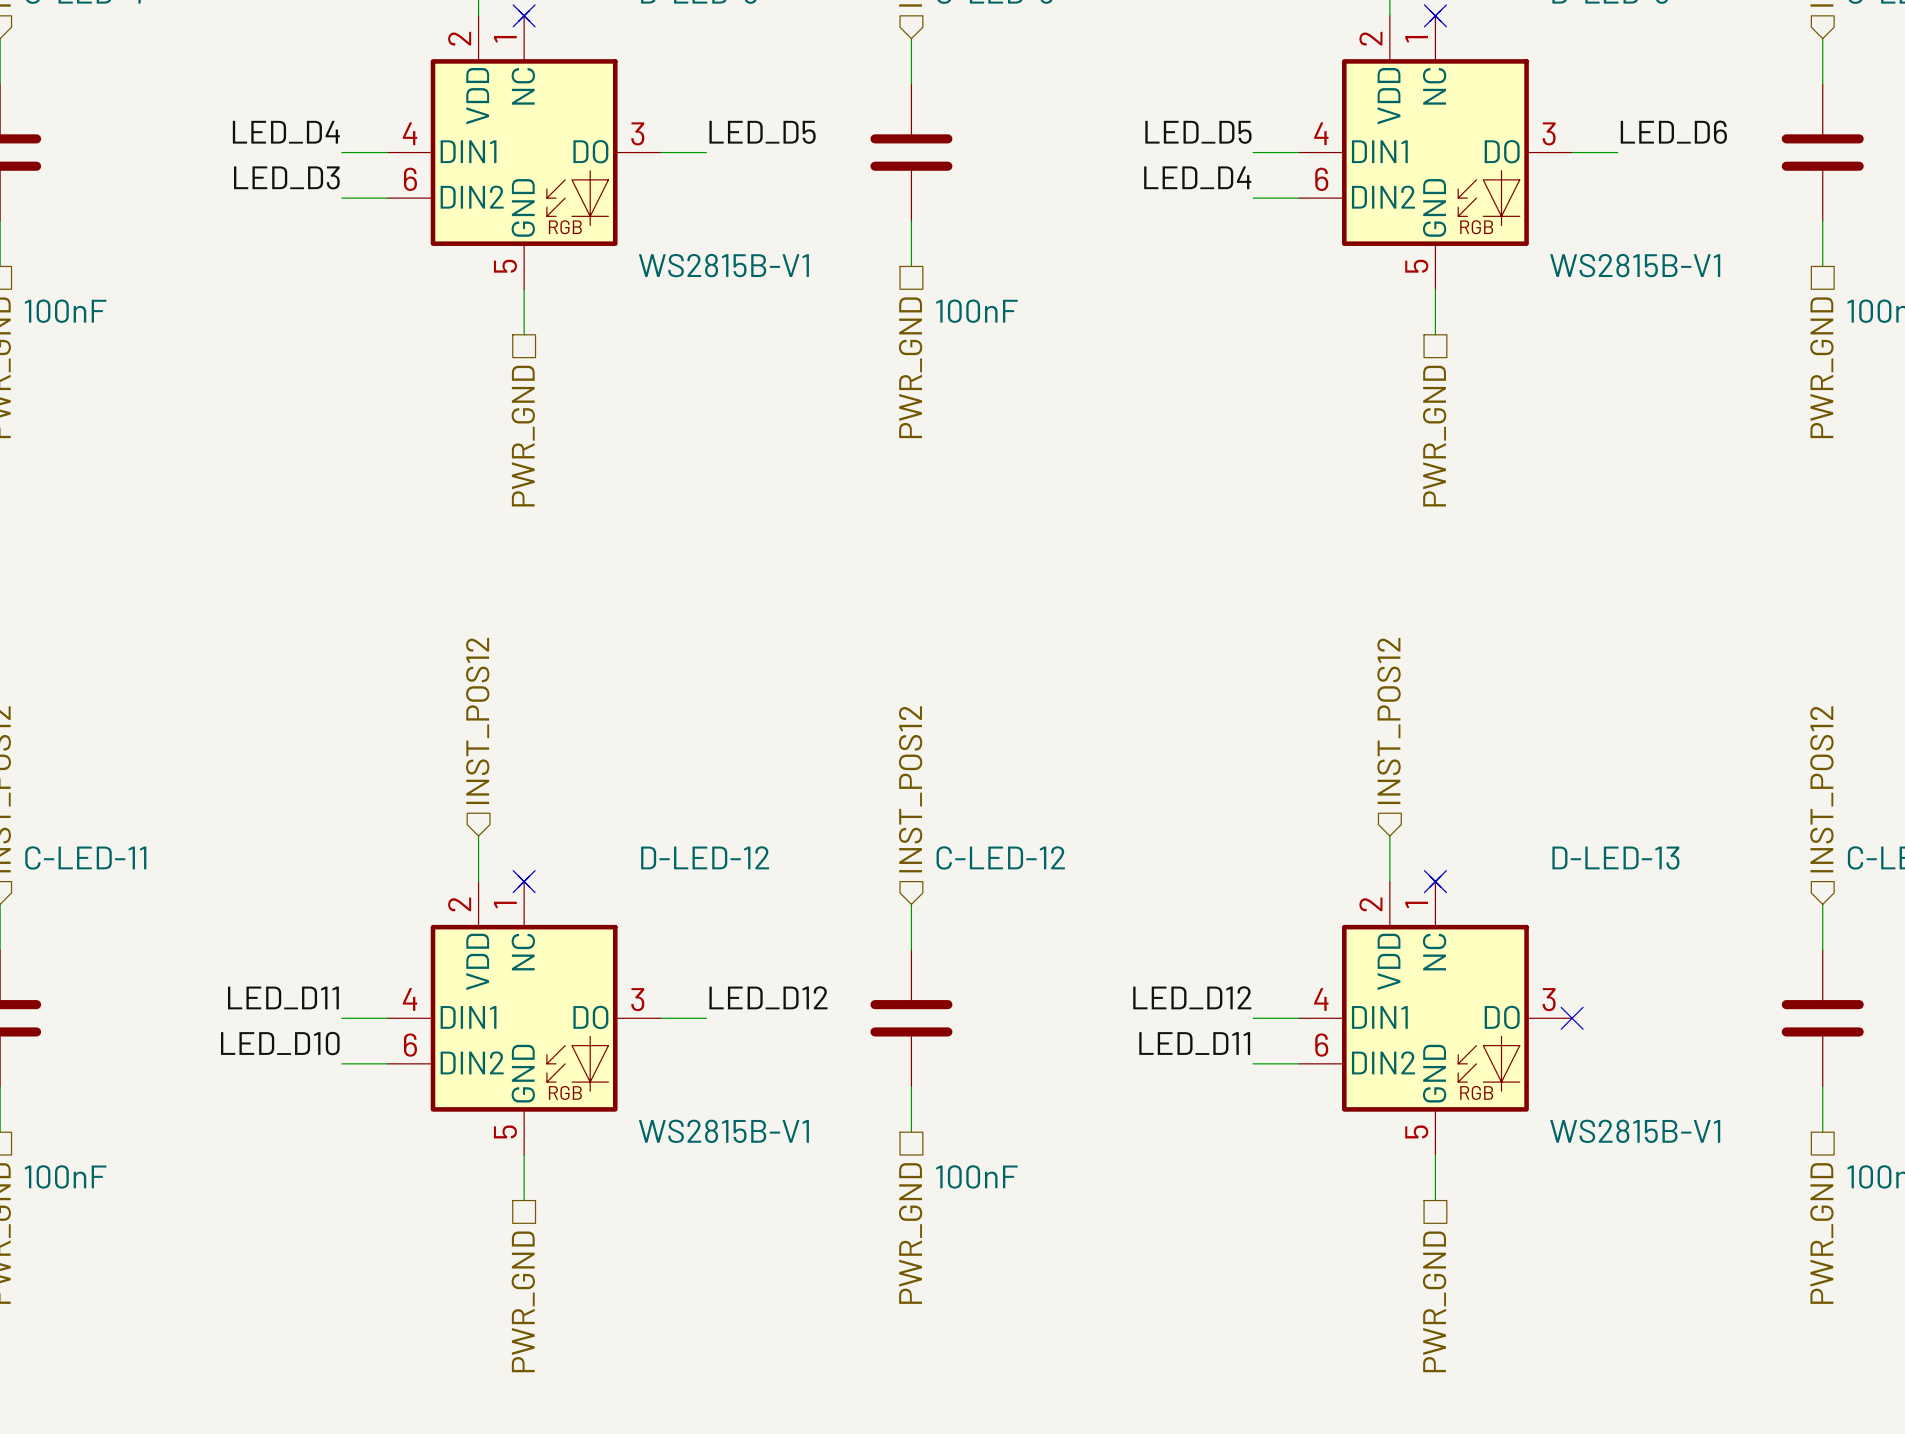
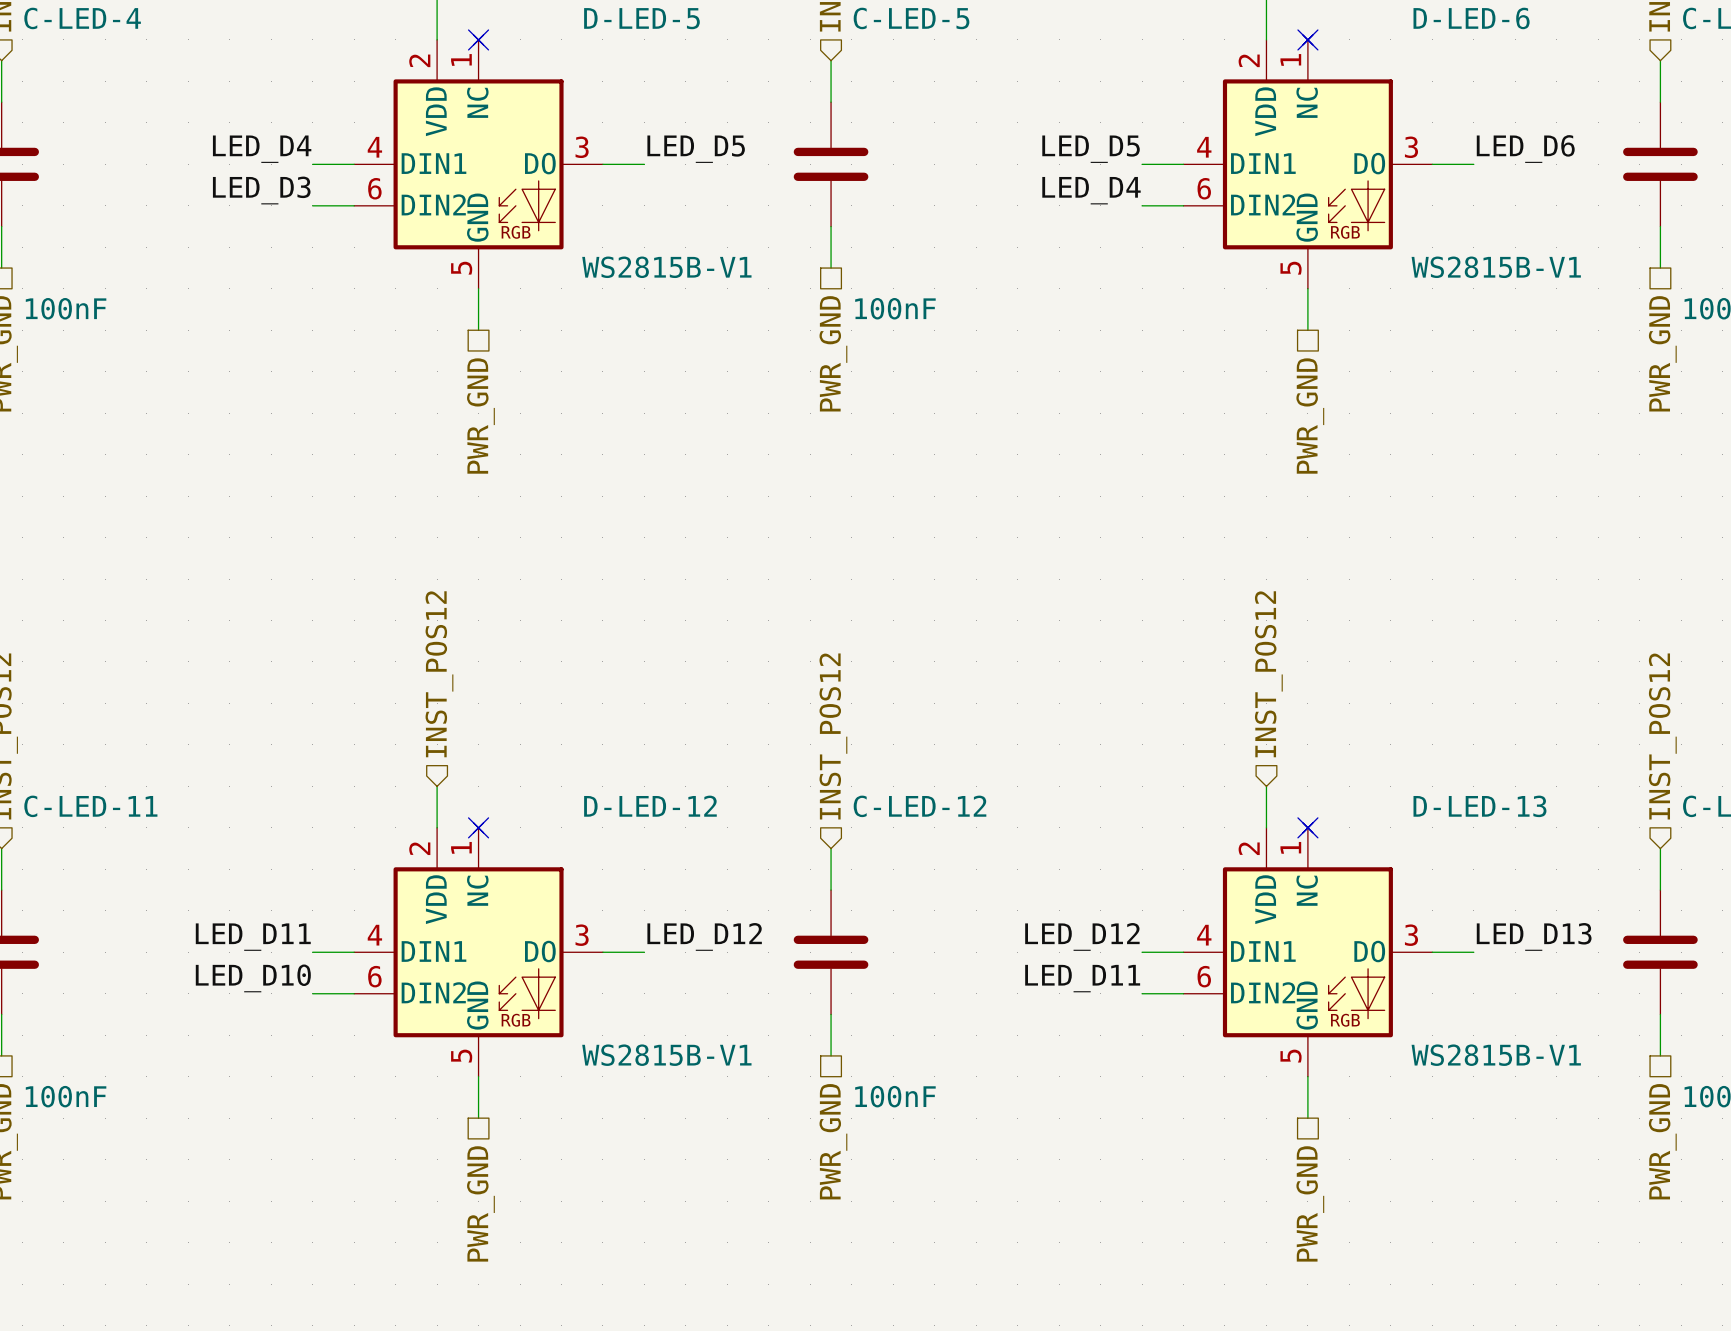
label: none -> LED_D13 (1534, 936)
wire: none -> (1432, 952) (1473, 952)
no-connect mark: (1572, 1018) -> none

